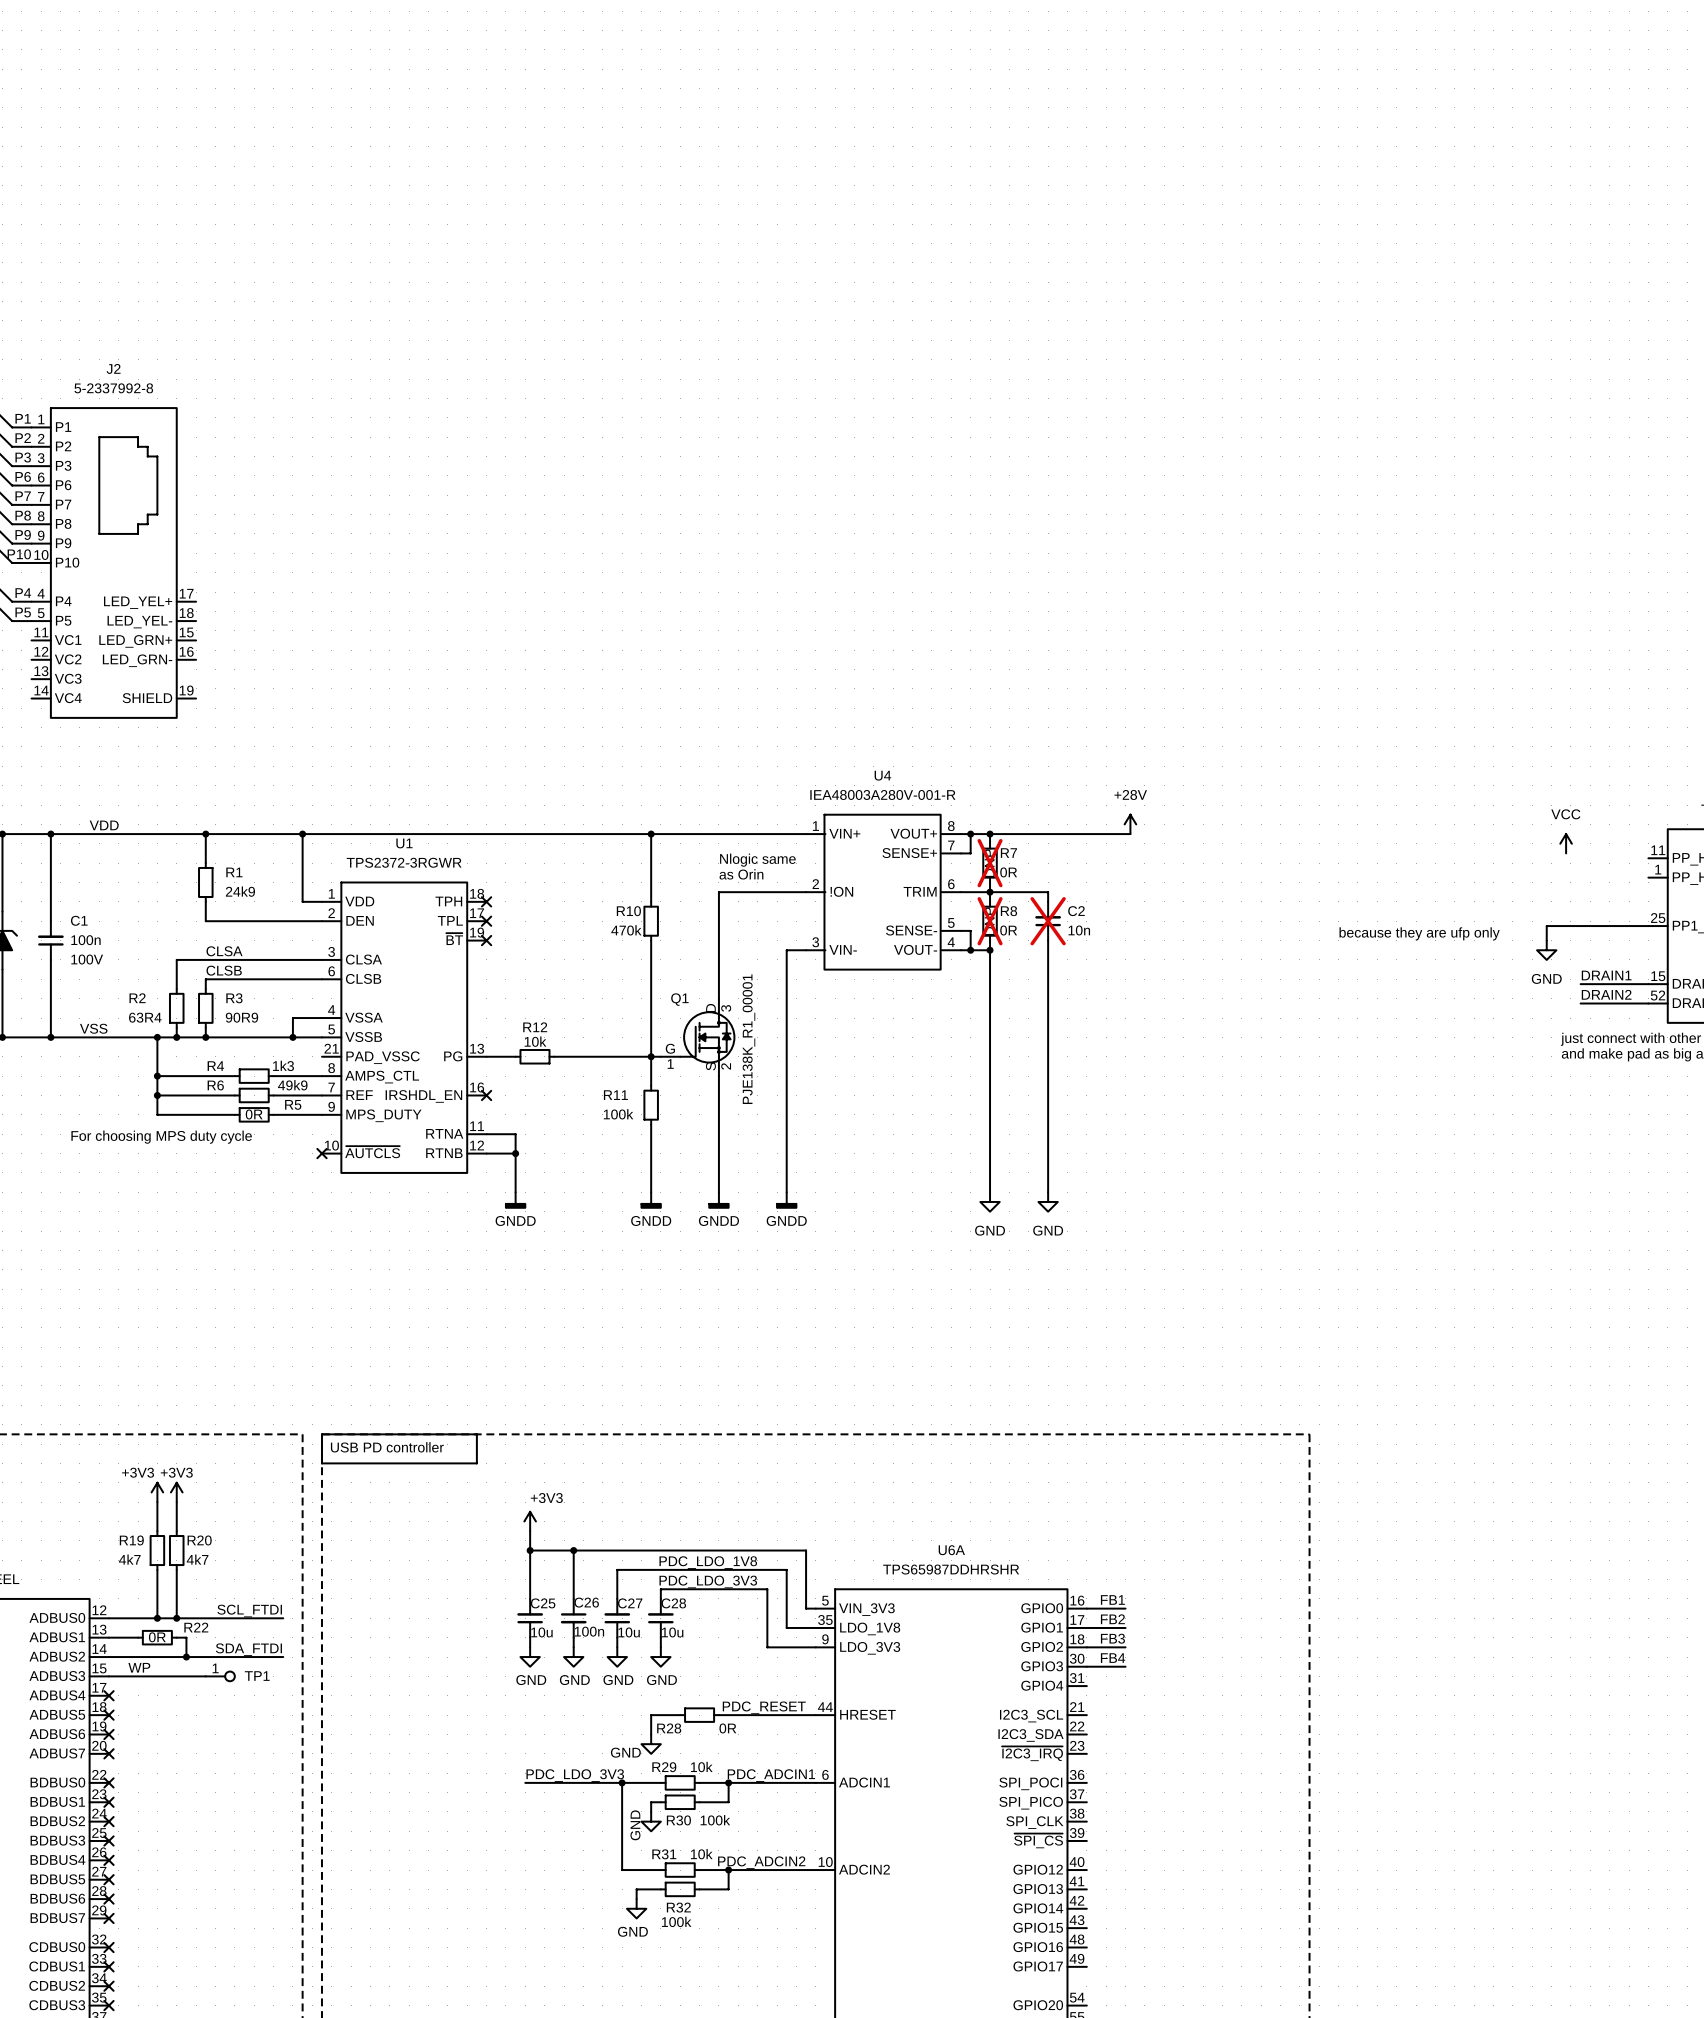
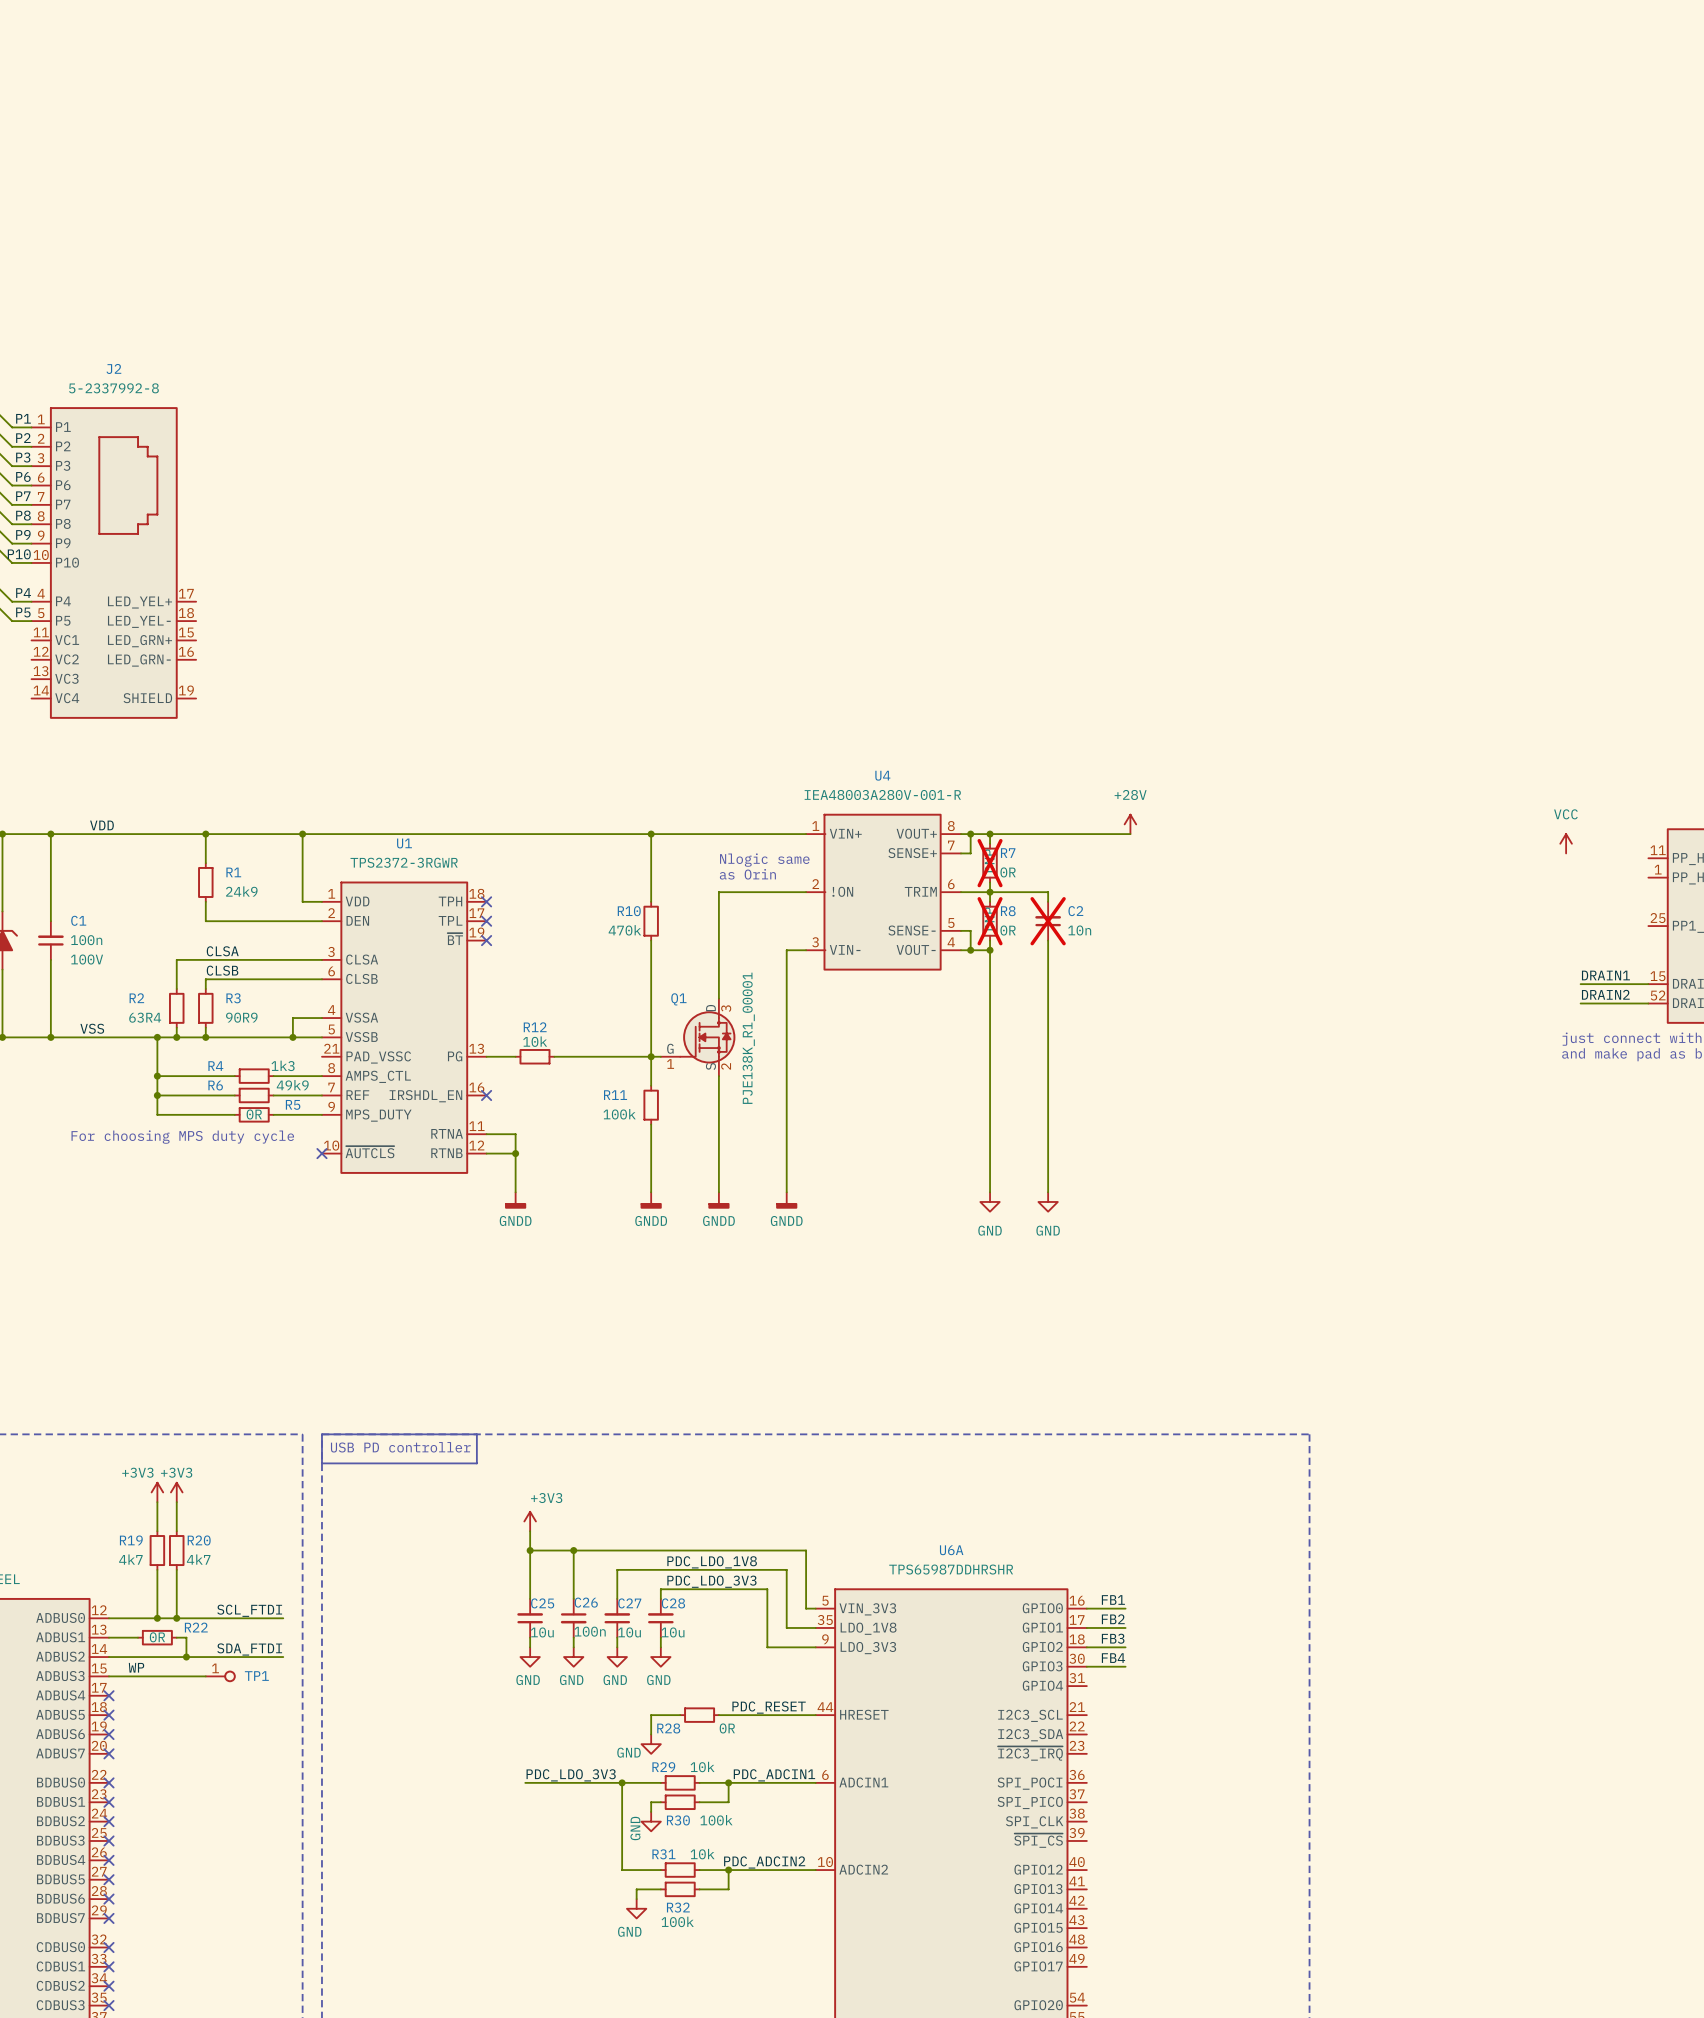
wire: (1648, 926) (1546, 926) (1546, 940) -> none
text: because they are ufp only (1419, 933) -> none
power symbol: GND (1546, 950) -> none

